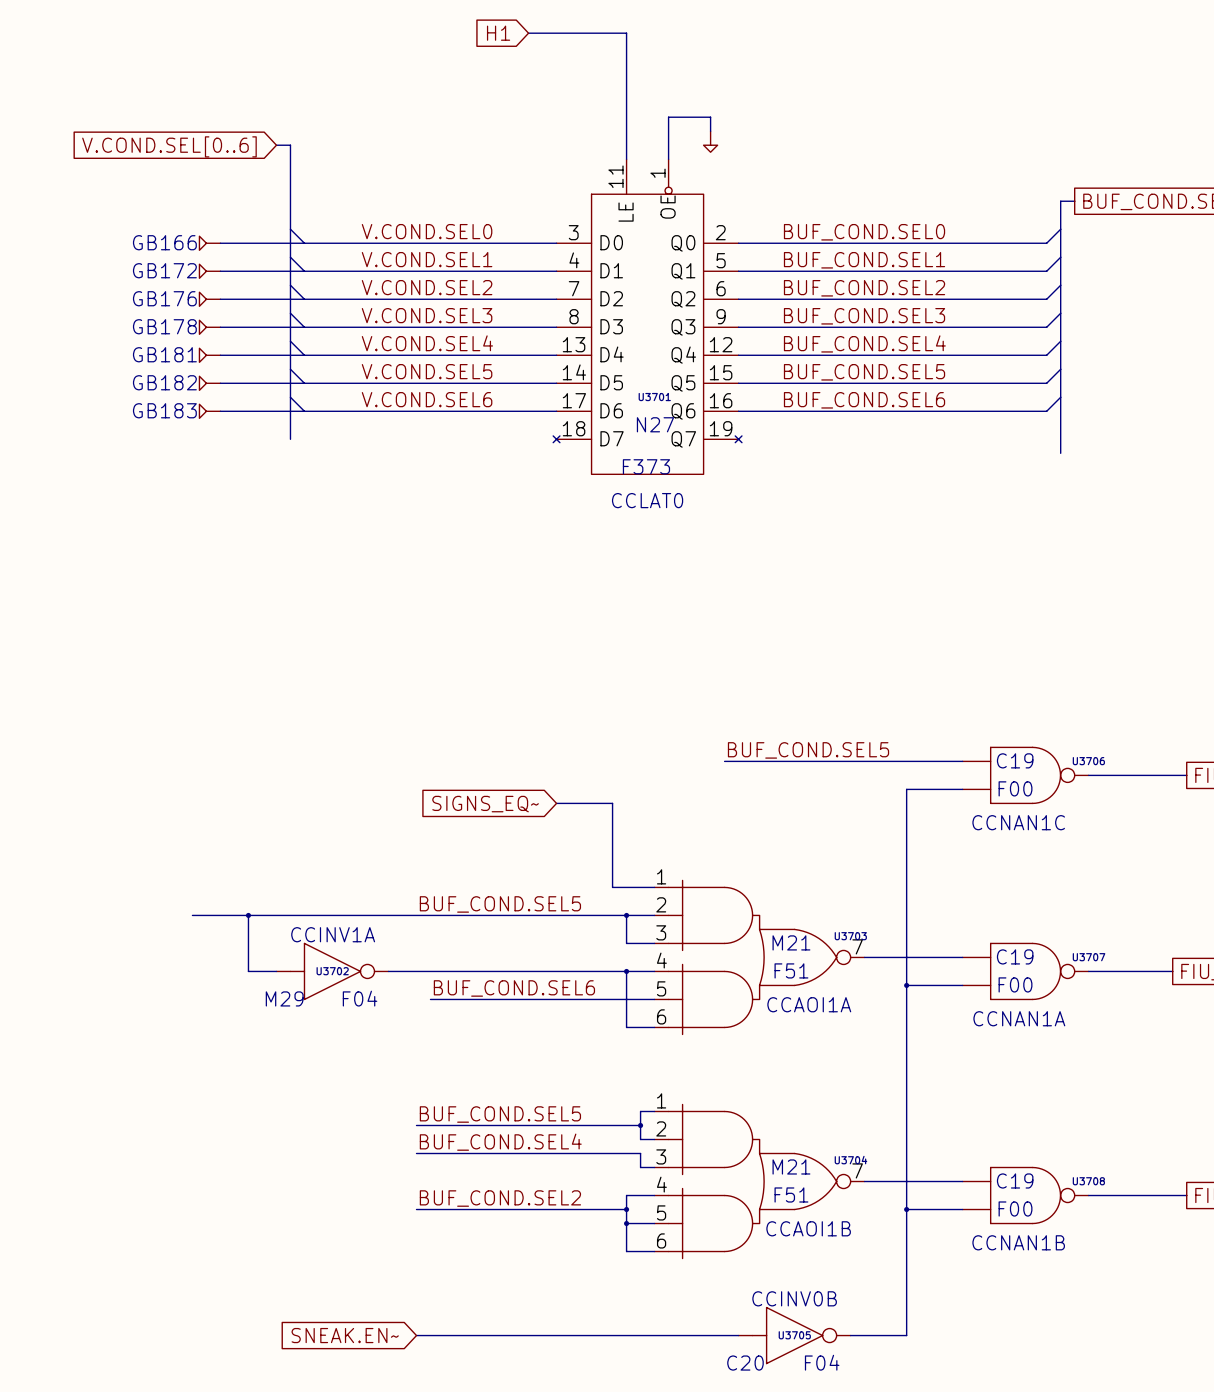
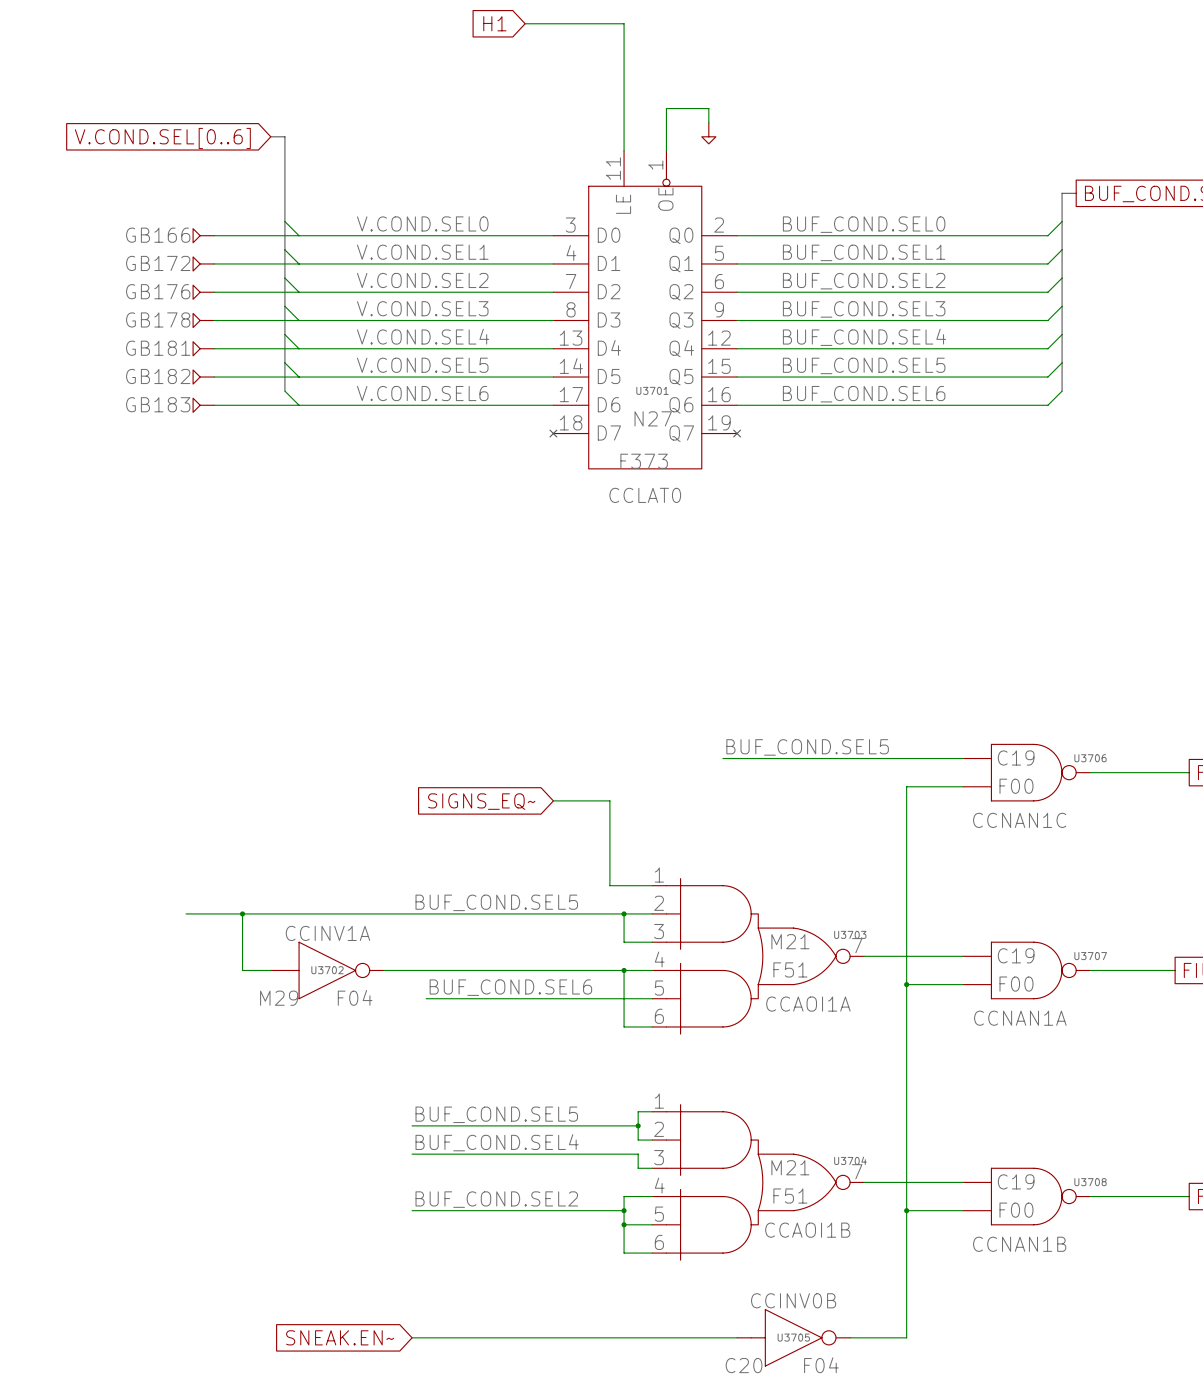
bus: (290, 397) (290, 439) -> none
bus: (1060, 397) (1060, 453) -> none

